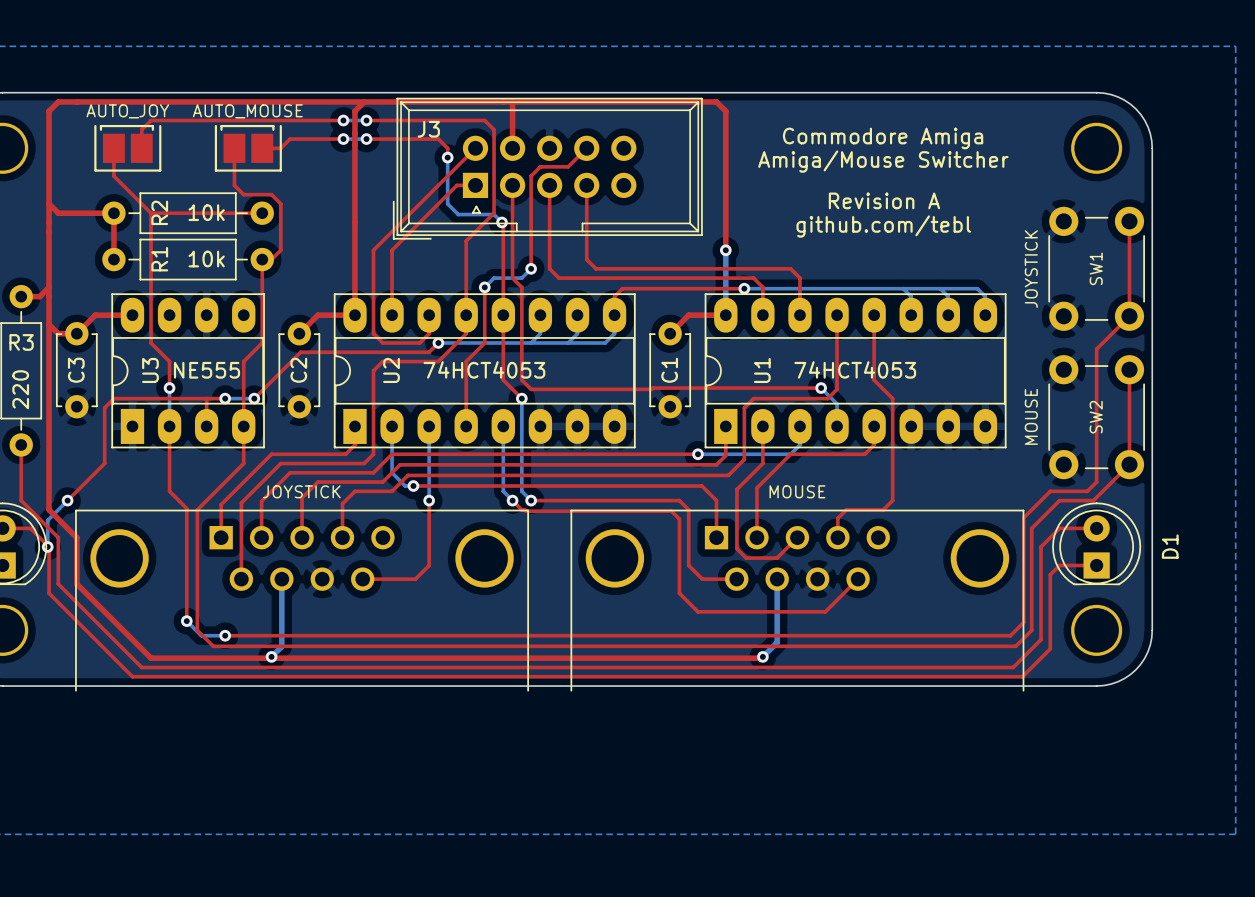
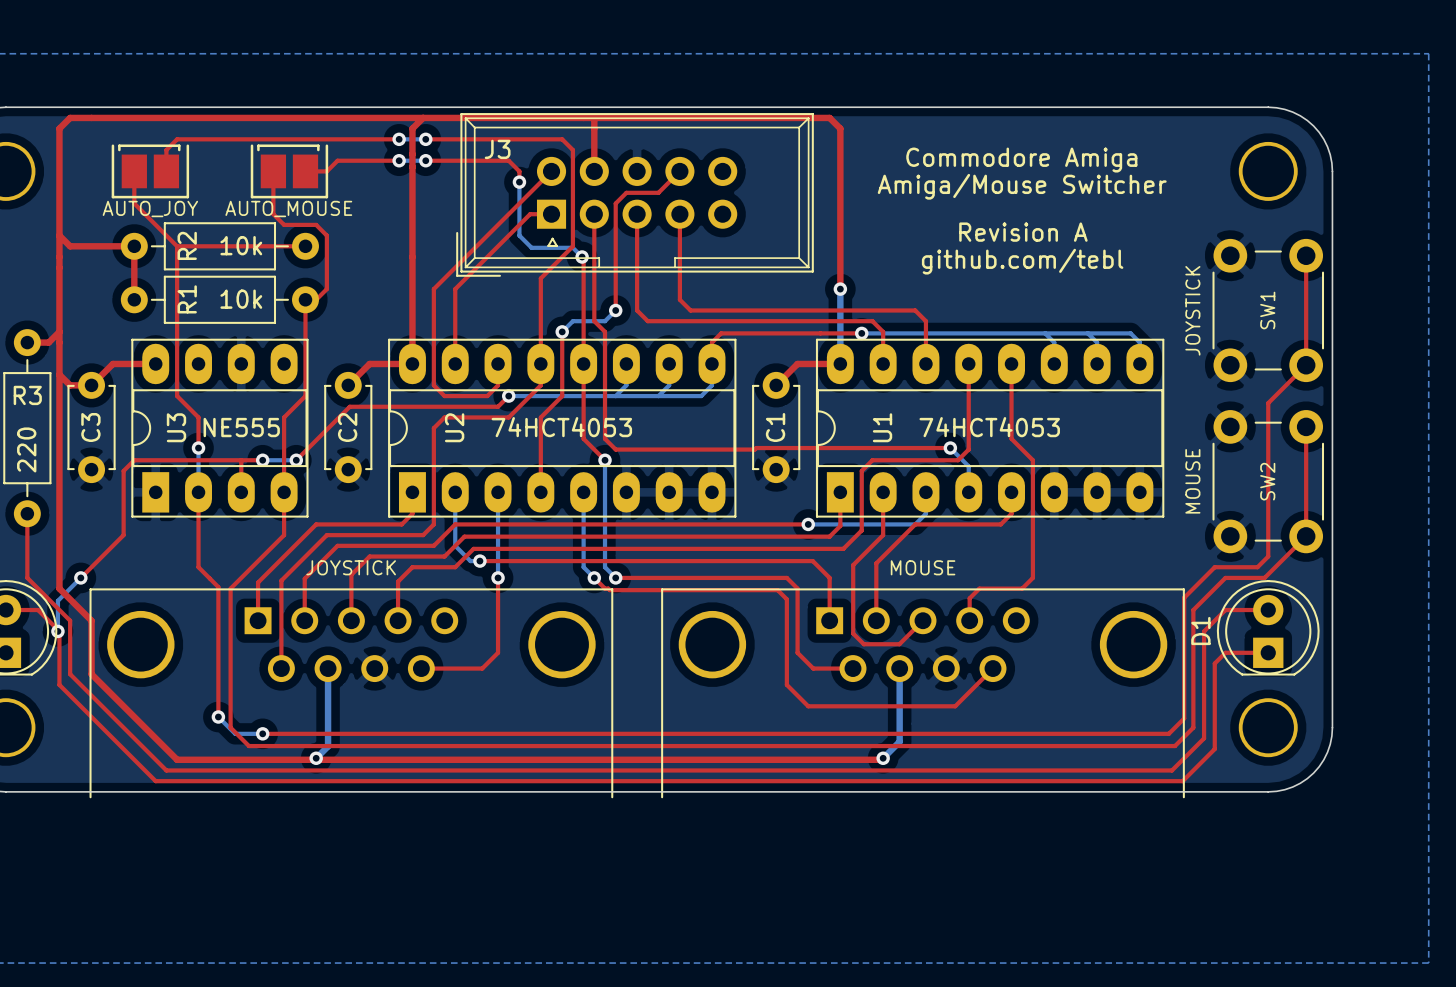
text position: AUTO_JOY (127, 111) -> AUTO_JOY (150, 209)
text position: AUTO_MOUSE (247, 111) -> AUTO_MOUSE (288, 209)
D1 name position: D1 (1170, 546) -> D1 (1200, 631)

